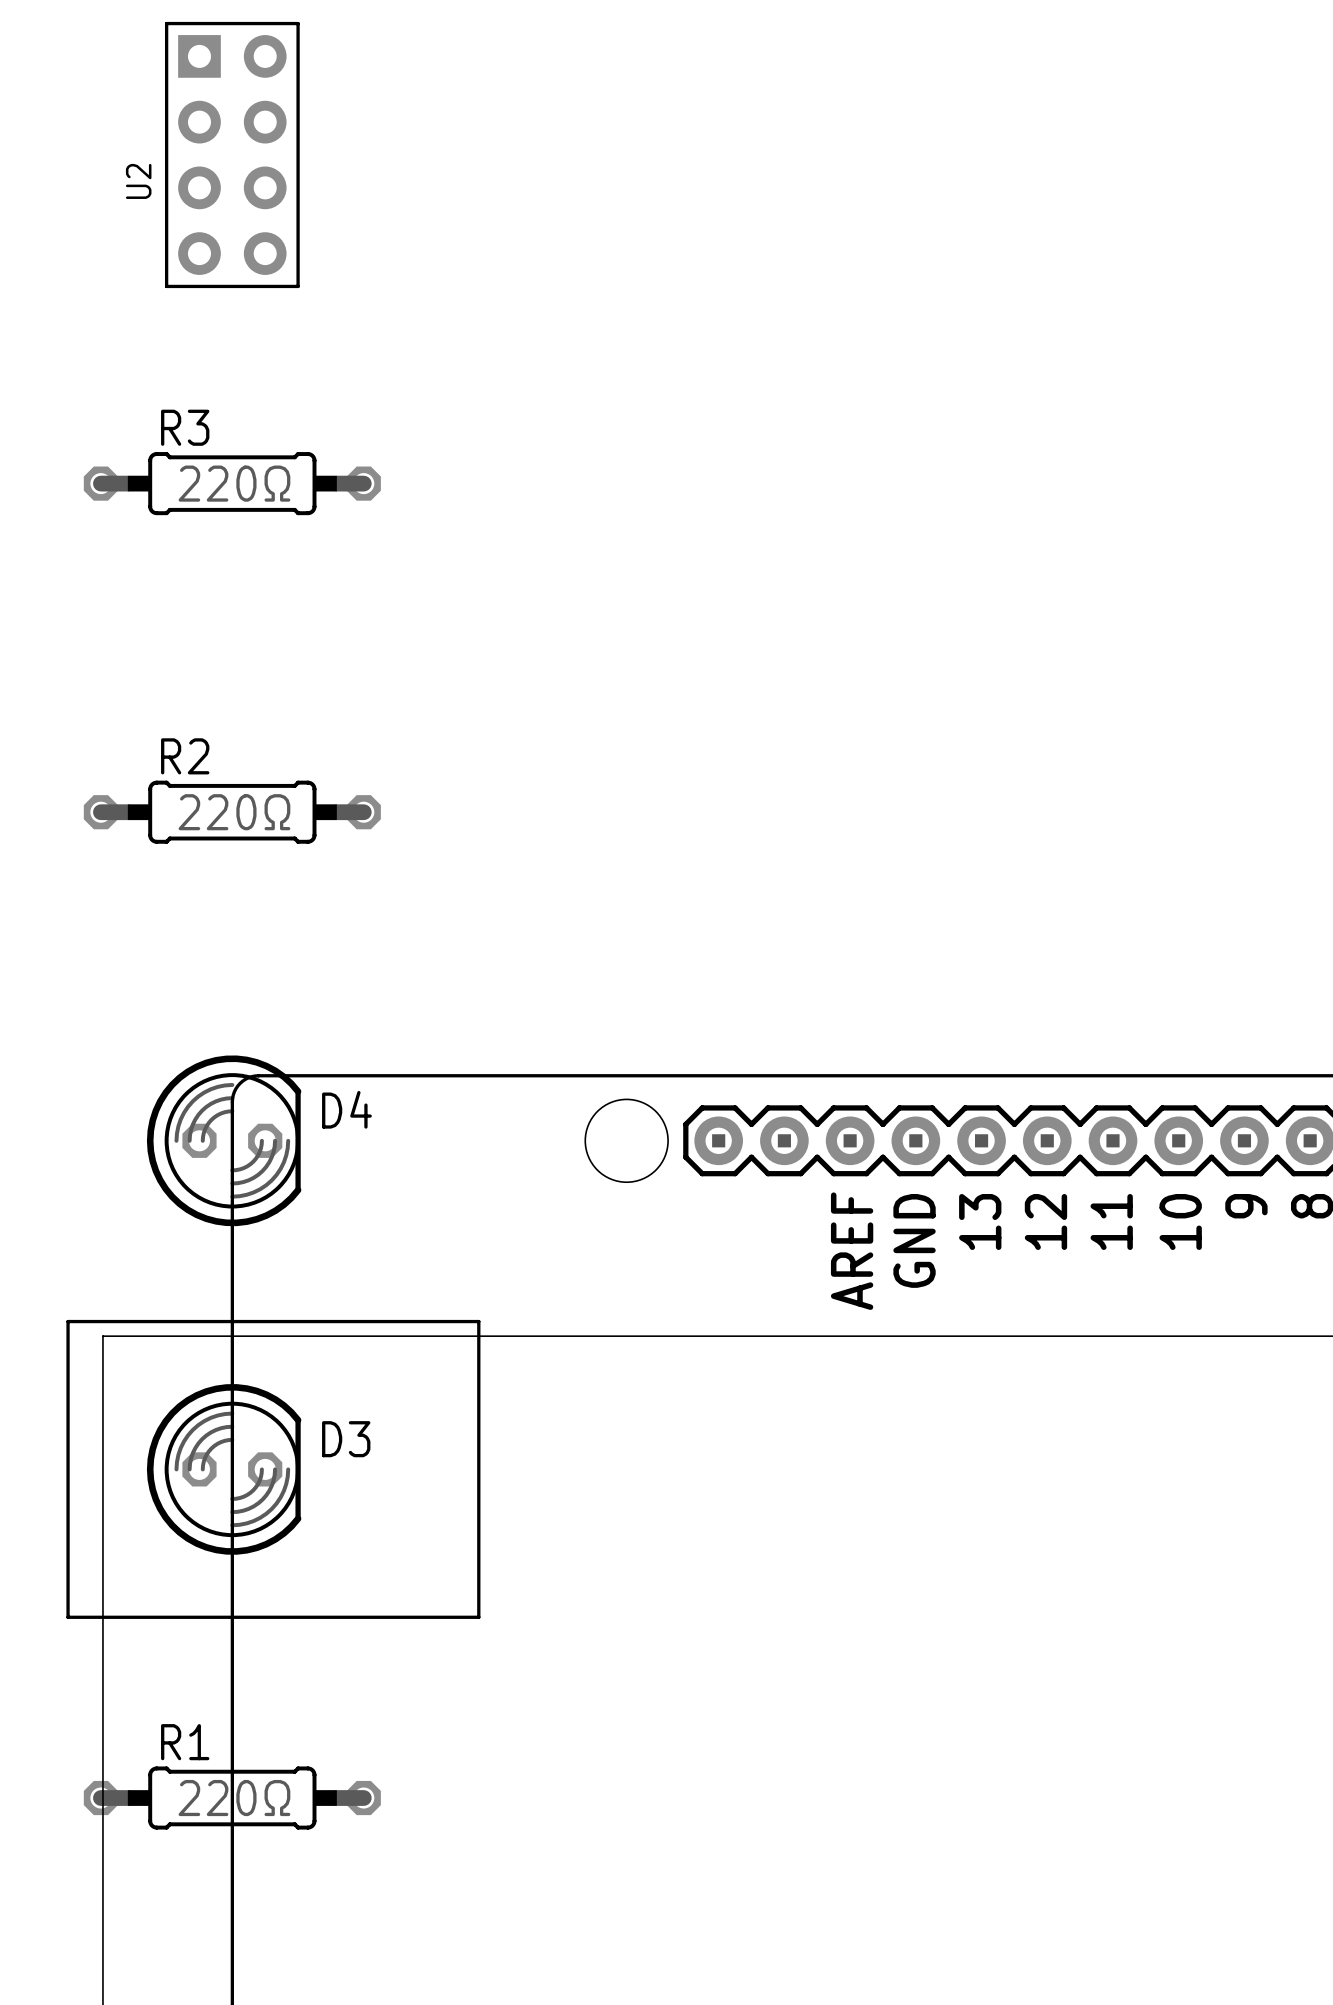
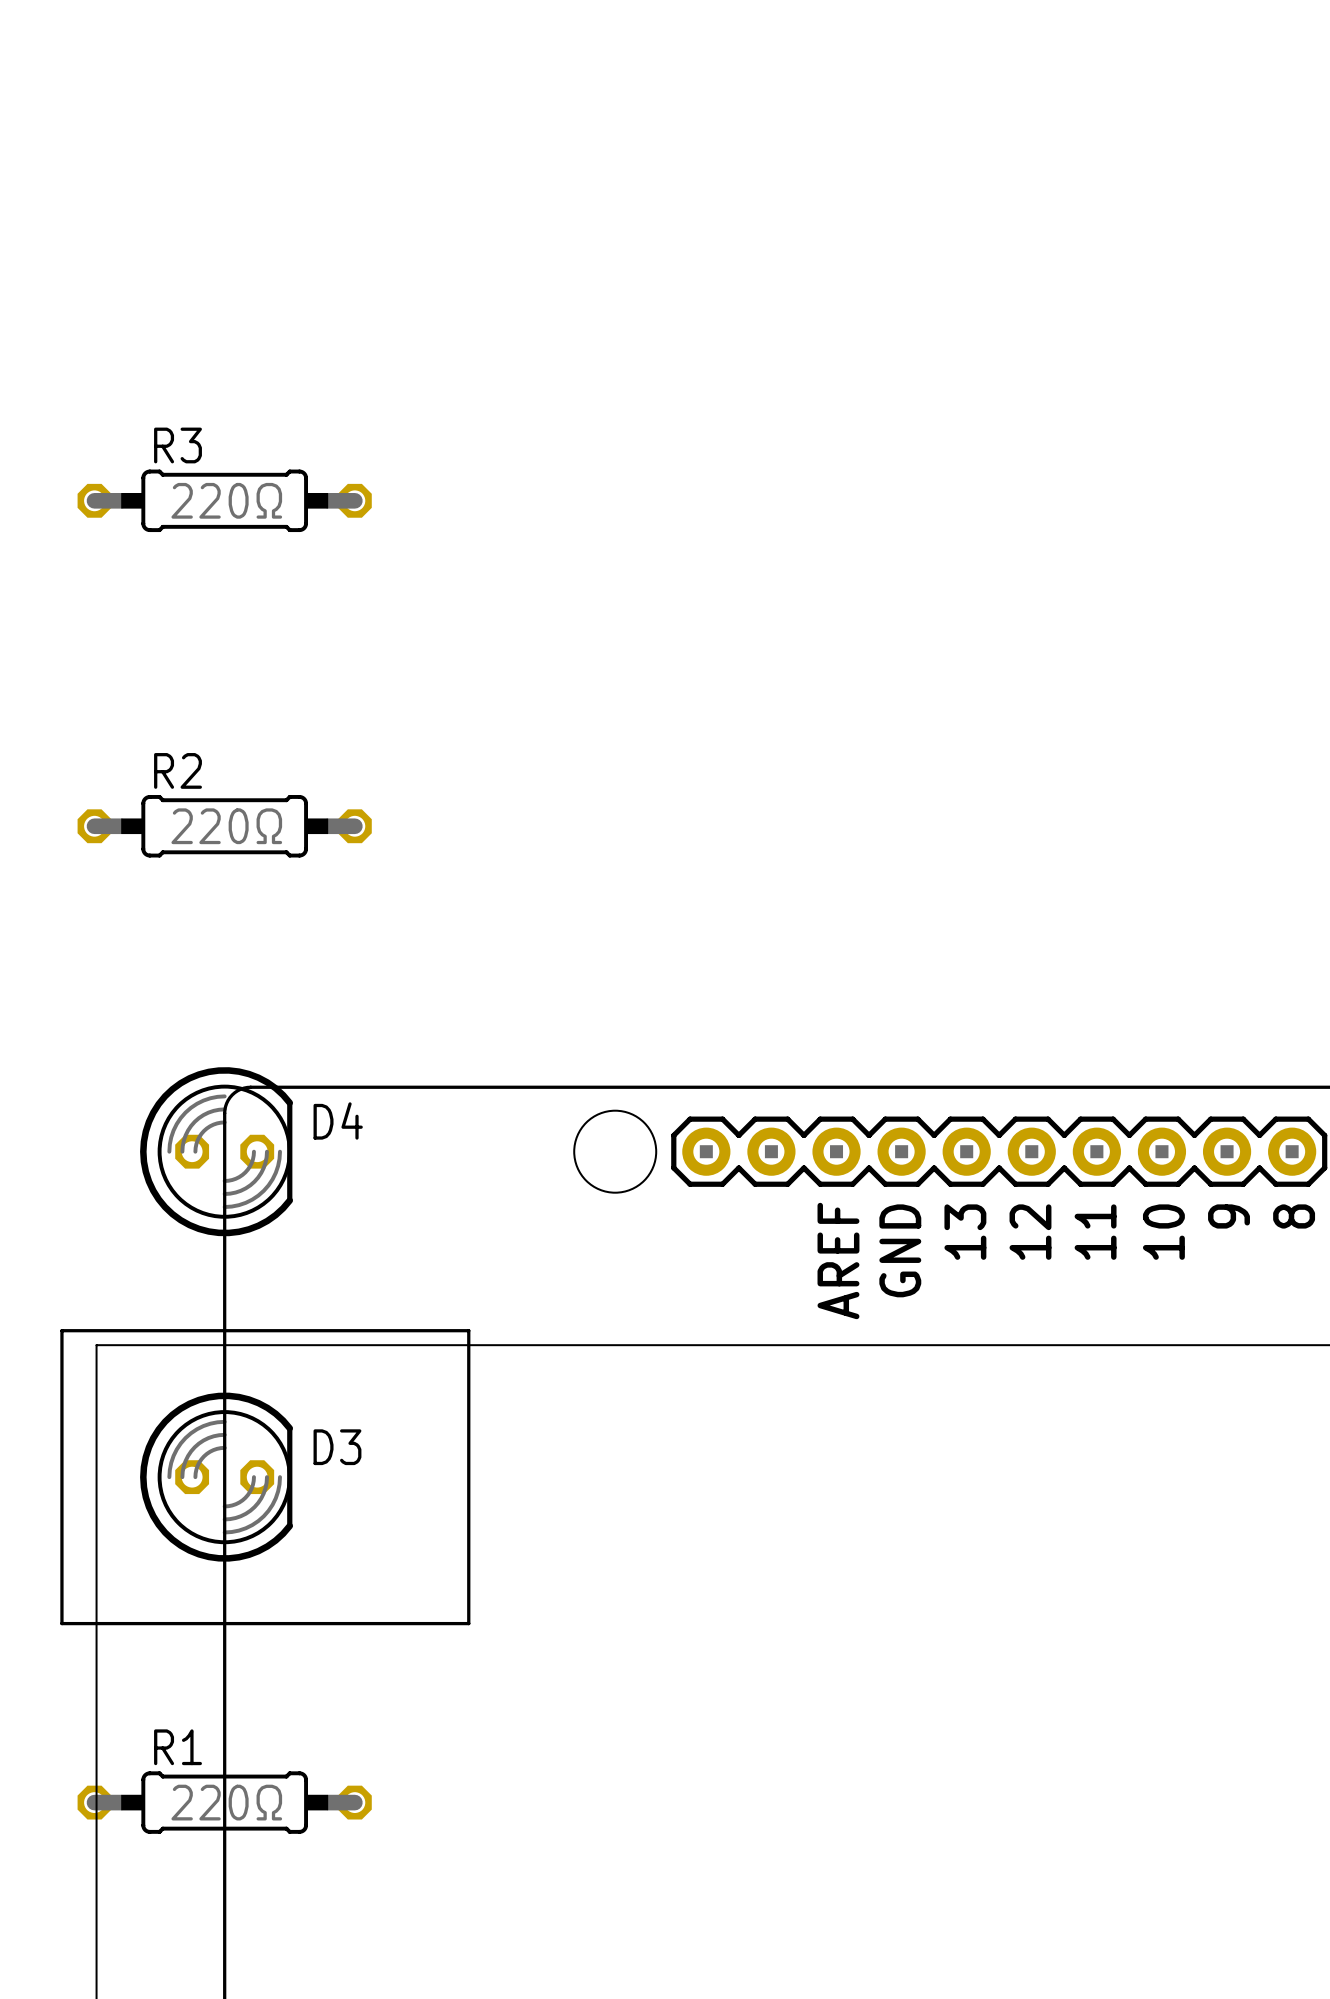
U2: (232, 155) -> none

